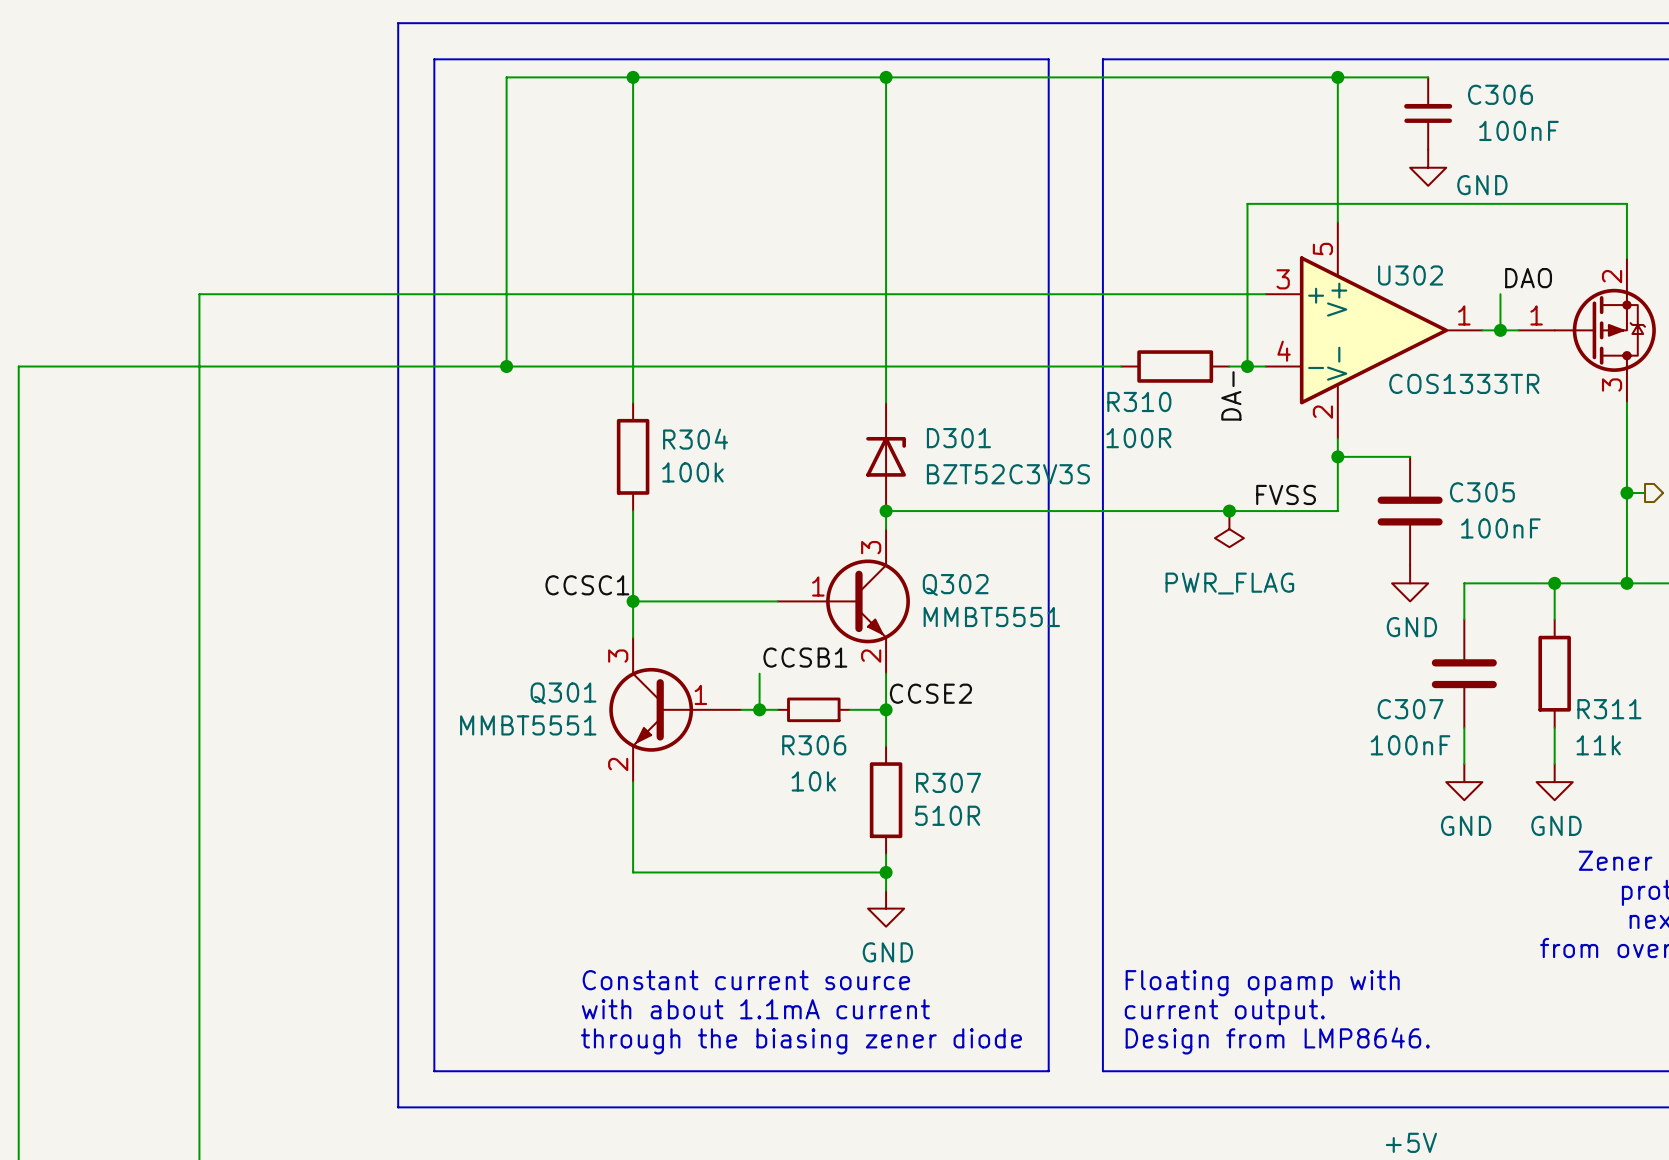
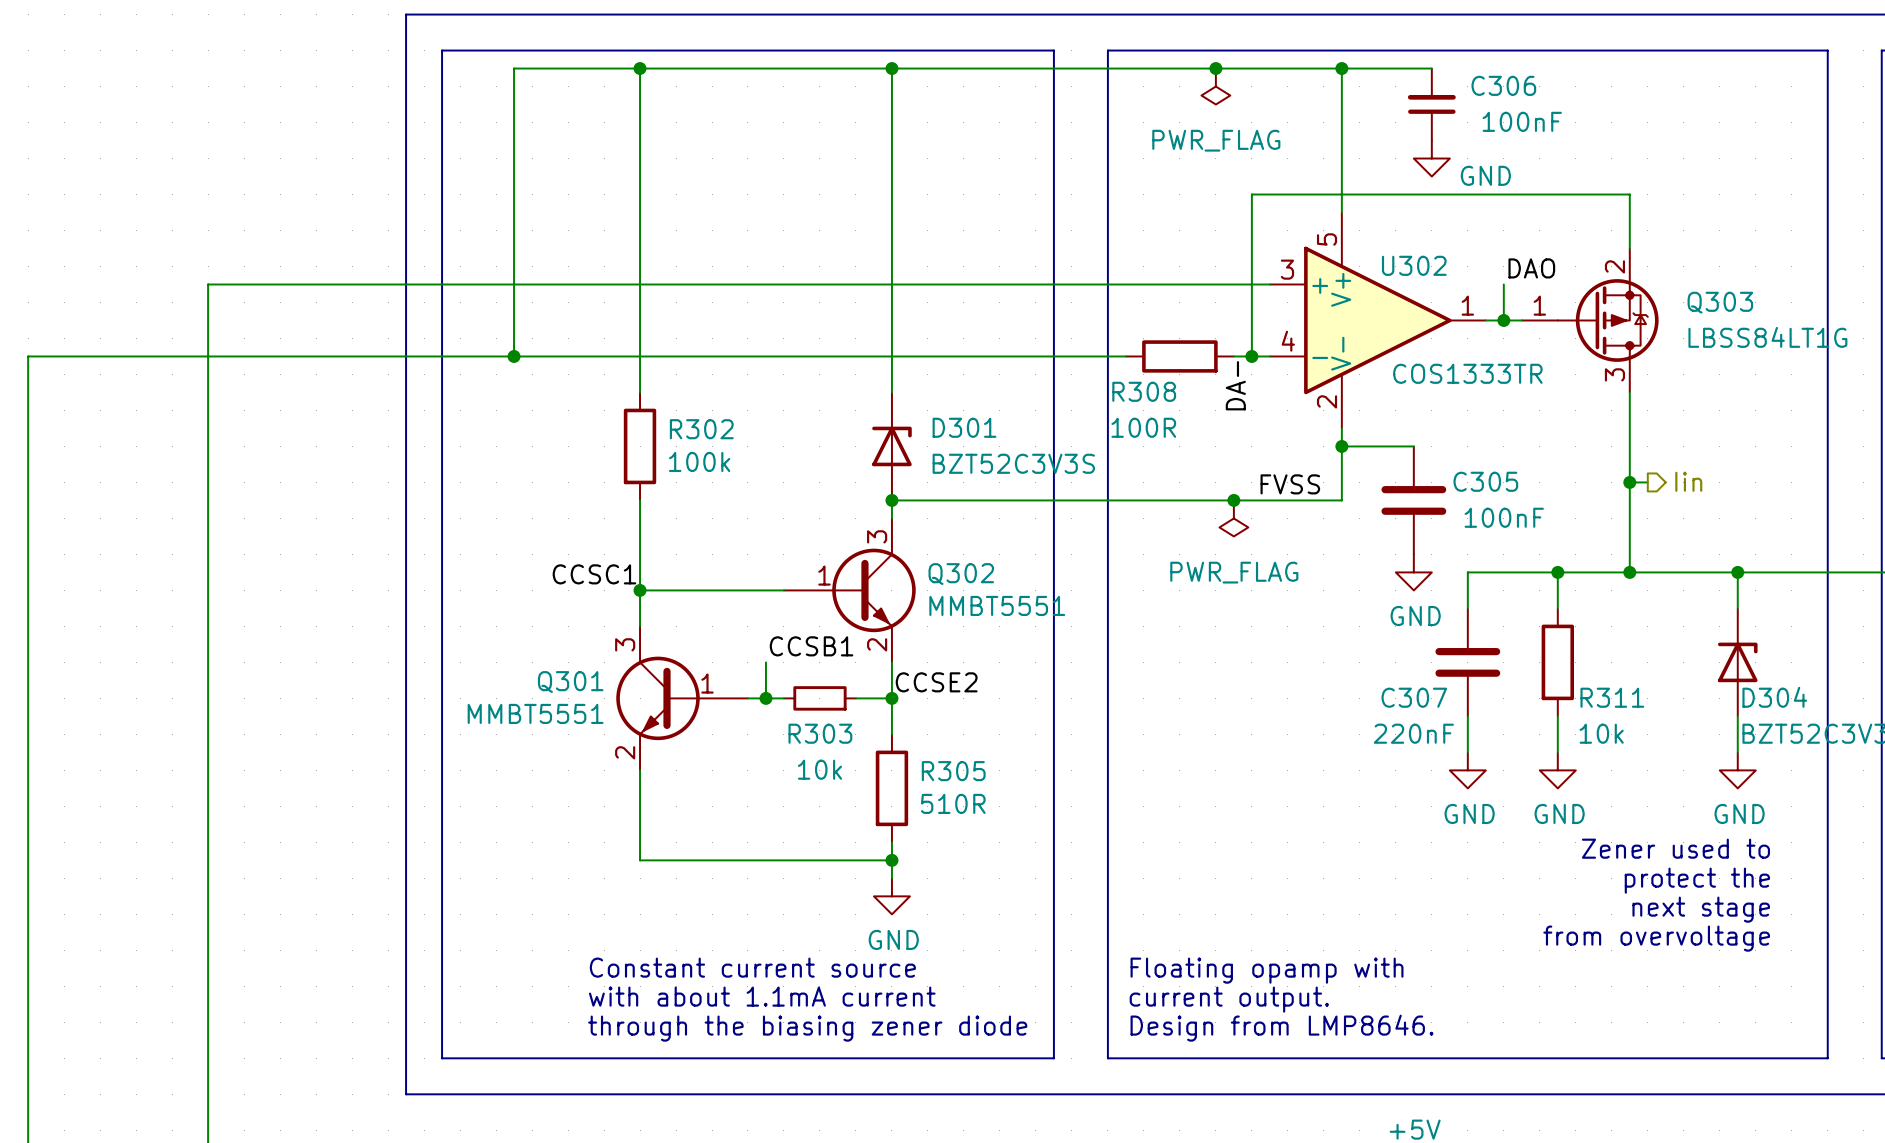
junction: none -> (1215, 68)
power symbol: none -> PWR_FLAG (1215, 86)
R310 name: R310 (1139, 401) -> R308 (1144, 391)
R304 name: R304 (695, 439) -> R302 (701, 429)
R306 name: R306 (814, 745) -> R303 (820, 733)
C307 value: 100nF (1410, 745) -> 220nF (1413, 733)
R311 value: 11k (1598, 745) -> 10k (1601, 733)
R307 name: R307 (948, 782) -> R305 (953, 771)

